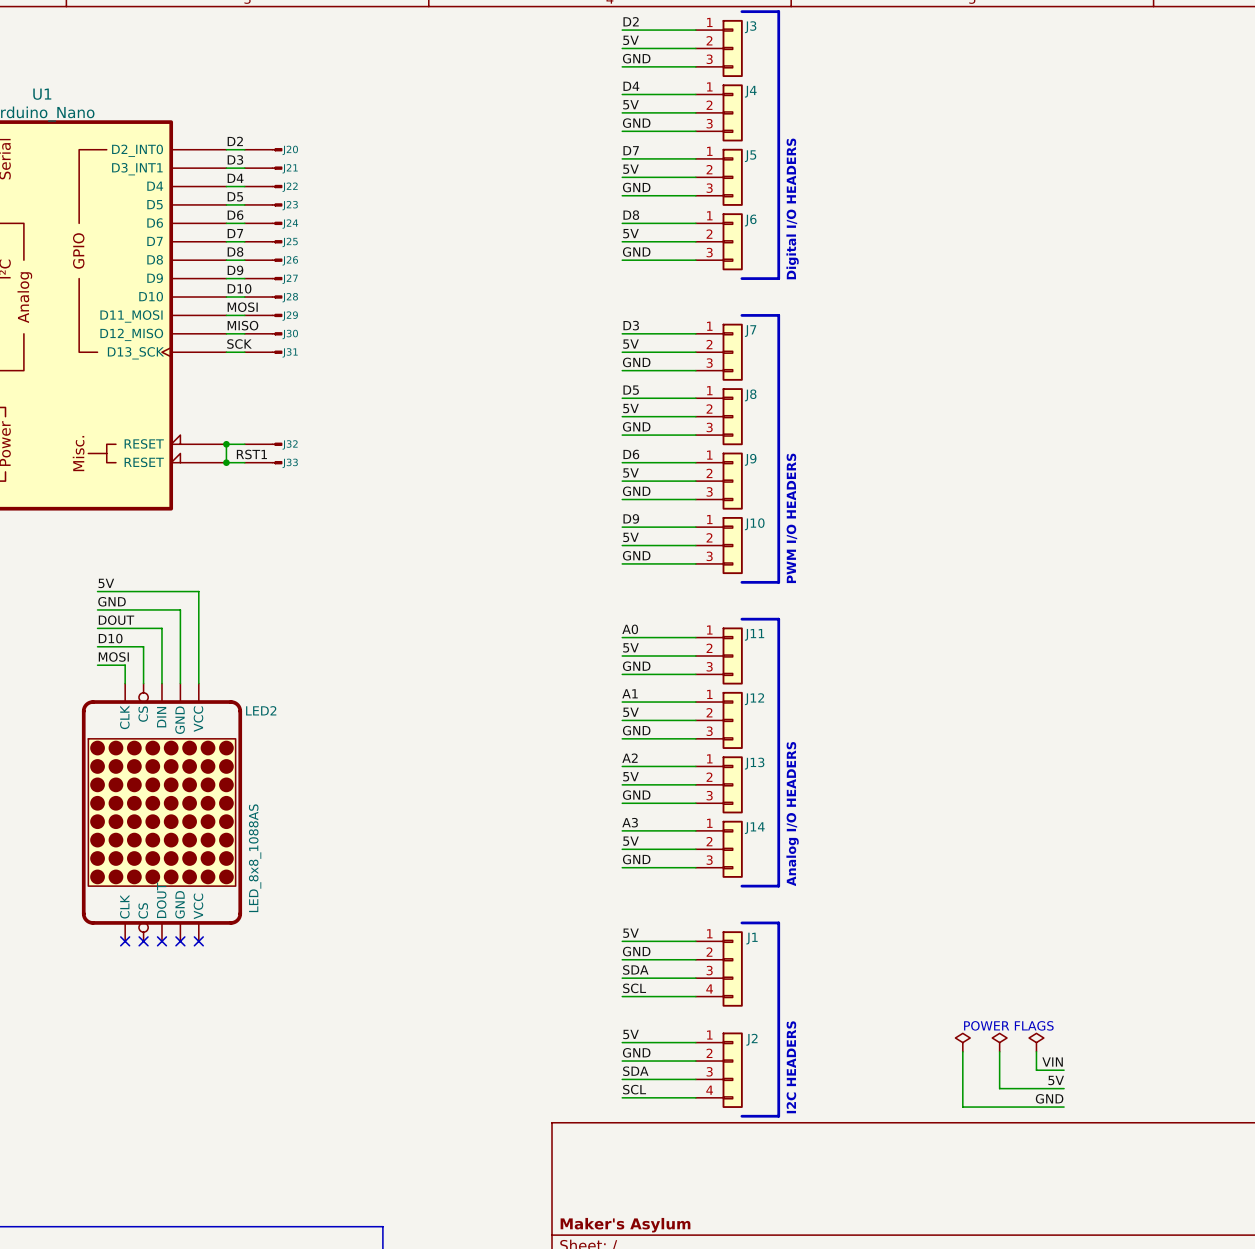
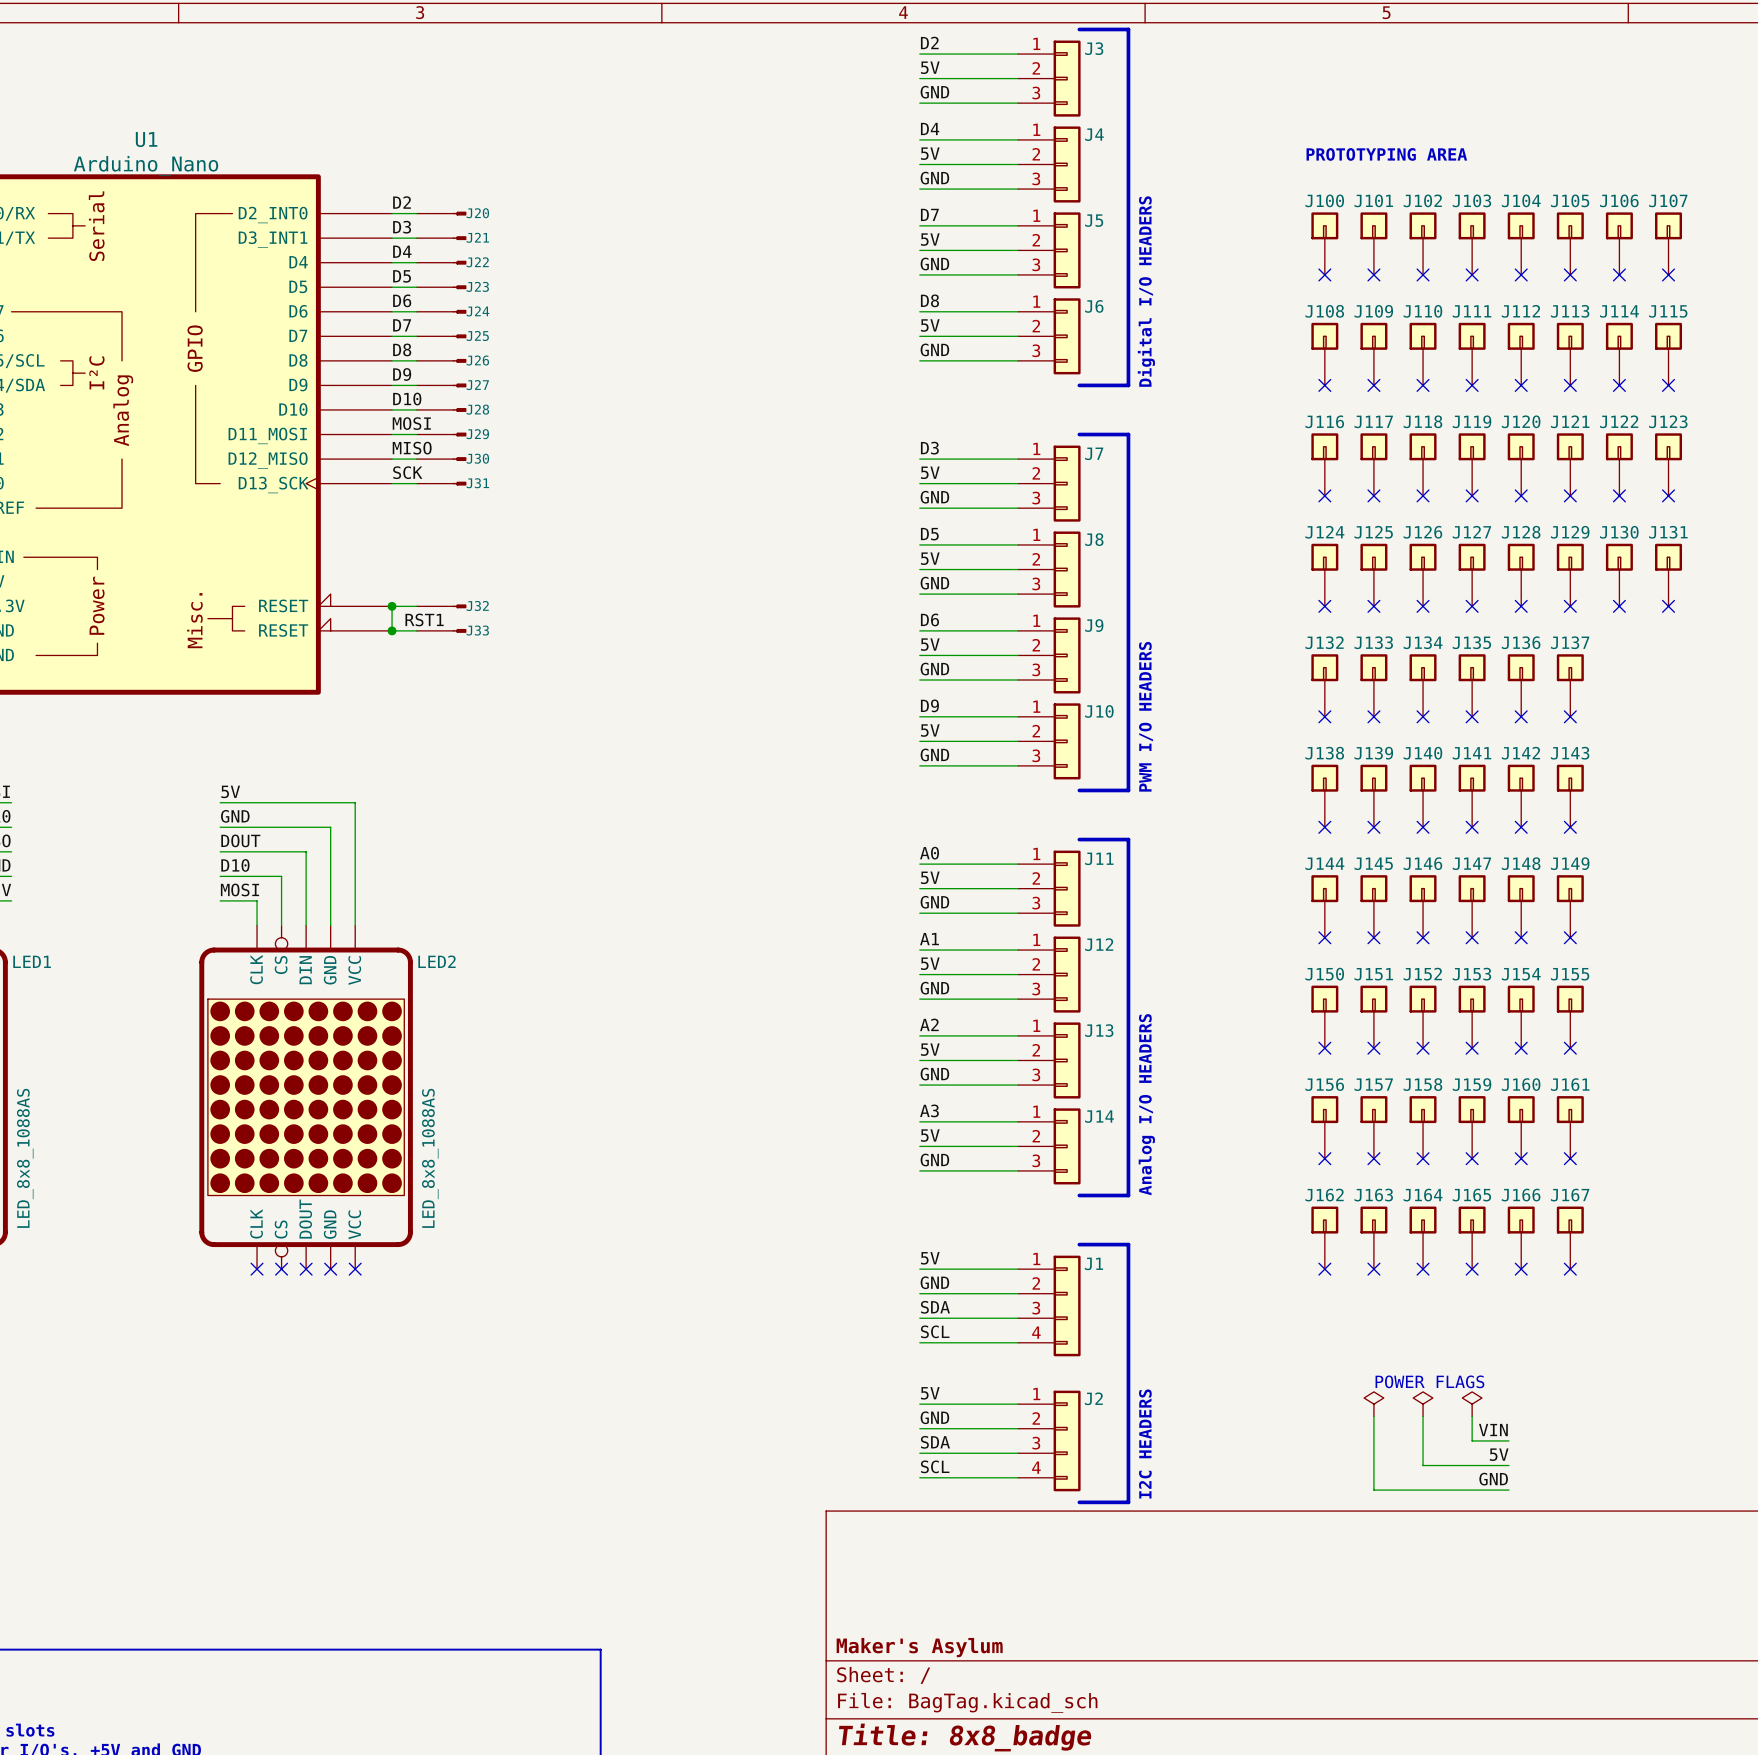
text: none -> PROTOTYPING AREA (1386, 154)
J100: none -> (1324, 243)
J101: none -> (1373, 243)
J102: none -> (1423, 243)
J103: none -> (1472, 243)
J104: none -> (1521, 243)
J105: none -> (1570, 243)
J106: none -> (1619, 243)
J107: none -> (1668, 243)
no-connect mark: none -> (1324, 274)
no-connect mark: none -> (1373, 274)
no-connect mark: none -> (1423, 274)
no-connect mark: none -> (1472, 274)
no-connect mark: none -> (1521, 274)
no-connect mark: none -> (1570, 274)
no-connect mark: none -> (1619, 274)
no-connect mark: none -> (1668, 274)
J108: none -> (1324, 354)
J109: none -> (1373, 354)
J110: none -> (1423, 354)
J111: none -> (1472, 354)
J112: none -> (1521, 354)
J113: none -> (1570, 354)
J114: none -> (1619, 354)
J115: none -> (1668, 354)
no-connect mark: none -> (1324, 385)
no-connect mark: none -> (1373, 385)
no-connect mark: none -> (1423, 385)
no-connect mark: none -> (1472, 385)
no-connect mark: none -> (1521, 385)
no-connect mark: none -> (1570, 385)
no-connect mark: none -> (1619, 385)
no-connect mark: none -> (1668, 385)
J116: none -> (1324, 464)
J117: none -> (1373, 464)
J118: none -> (1423, 464)
J119: none -> (1472, 464)
J120: none -> (1521, 464)
J121: none -> (1570, 464)
J122: none -> (1619, 464)
J123: none -> (1668, 464)
no-connect mark: none -> (1324, 495)
no-connect mark: none -> (1373, 495)
no-connect mark: none -> (1423, 495)
no-connect mark: none -> (1472, 495)
no-connect mark: none -> (1521, 495)
no-connect mark: none -> (1570, 495)
no-connect mark: none -> (1619, 495)
no-connect mark: none -> (1668, 495)
J124: none -> (1324, 575)
J125: none -> (1373, 575)
J126: none -> (1423, 575)
J127: none -> (1472, 575)
J128: none -> (1521, 575)
J129: none -> (1570, 575)
J130: none -> (1619, 575)
J131: none -> (1668, 575)
no-connect mark: none -> (1324, 606)
no-connect mark: none -> (1373, 606)
no-connect mark: none -> (1423, 606)
no-connect mark: none -> (1472, 606)
no-connect mark: none -> (1521, 606)
no-connect mark: none -> (1570, 606)
no-connect mark: none -> (1619, 606)
no-connect mark: none -> (1668, 606)
J132: none -> (1324, 685)
J133: none -> (1373, 685)
J134: none -> (1423, 685)
J135: none -> (1472, 685)
J136: none -> (1521, 685)
J137: none -> (1570, 685)
no-connect mark: none -> (1324, 716)
no-connect mark: none -> (1373, 716)
no-connect mark: none -> (1423, 716)
no-connect mark: none -> (1472, 716)
no-connect mark: none -> (1521, 716)
no-connect mark: none -> (1570, 716)
J138: none -> (1324, 795)
J139: none -> (1373, 795)
J140: none -> (1423, 795)
J141: none -> (1472, 795)
J142: none -> (1521, 795)
J143: none -> (1570, 795)
no-connect mark: none -> (1324, 827)
no-connect mark: none -> (1373, 827)
no-connect mark: none -> (1423, 827)
no-connect mark: none -> (1472, 827)
no-connect mark: none -> (1521, 827)
no-connect mark: none -> (1570, 827)
J144: none -> (1324, 906)
J145: none -> (1373, 906)
J146: none -> (1423, 906)
J147: none -> (1472, 906)
J148: none -> (1521, 906)
J149: none -> (1570, 906)
no-connect mark: none -> (1324, 937)
no-connect mark: none -> (1373, 937)
no-connect mark: none -> (1423, 937)
no-connect mark: none -> (1472, 937)
no-connect mark: none -> (1521, 937)
no-connect mark: none -> (1570, 937)
J150: none -> (1324, 1016)
J151: none -> (1373, 1016)
J152: none -> (1423, 1016)
J153: none -> (1472, 1016)
J154: none -> (1521, 1016)
J155: none -> (1570, 1016)
no-connect mark: none -> (1324, 1048)
no-connect mark: none -> (1373, 1048)
no-connect mark: none -> (1423, 1048)
no-connect mark: none -> (1472, 1048)
no-connect mark: none -> (1521, 1048)
no-connect mark: none -> (1570, 1048)
J156: none -> (1324, 1127)
J157: none -> (1373, 1127)
J158: none -> (1423, 1127)
J159: none -> (1472, 1127)
J160: none -> (1521, 1127)
J161: none -> (1570, 1127)
no-connect mark: none -> (1324, 1158)
no-connect mark: none -> (1373, 1158)
no-connect mark: none -> (1423, 1158)
no-connect mark: none -> (1472, 1158)
no-connect mark: none -> (1521, 1158)
no-connect mark: none -> (1570, 1158)
J162: none -> (1324, 1237)
J163: none -> (1373, 1237)
J164: none -> (1423, 1237)
J165: none -> (1472, 1237)
J166: none -> (1521, 1237)
J167: none -> (1570, 1237)
no-connect mark: none -> (1324, 1269)
no-connect mark: none -> (1373, 1269)
no-connect mark: none -> (1423, 1269)
no-connect mark: none -> (1472, 1269)
no-connect mark: none -> (1521, 1269)
no-connect mark: none -> (1570, 1269)

